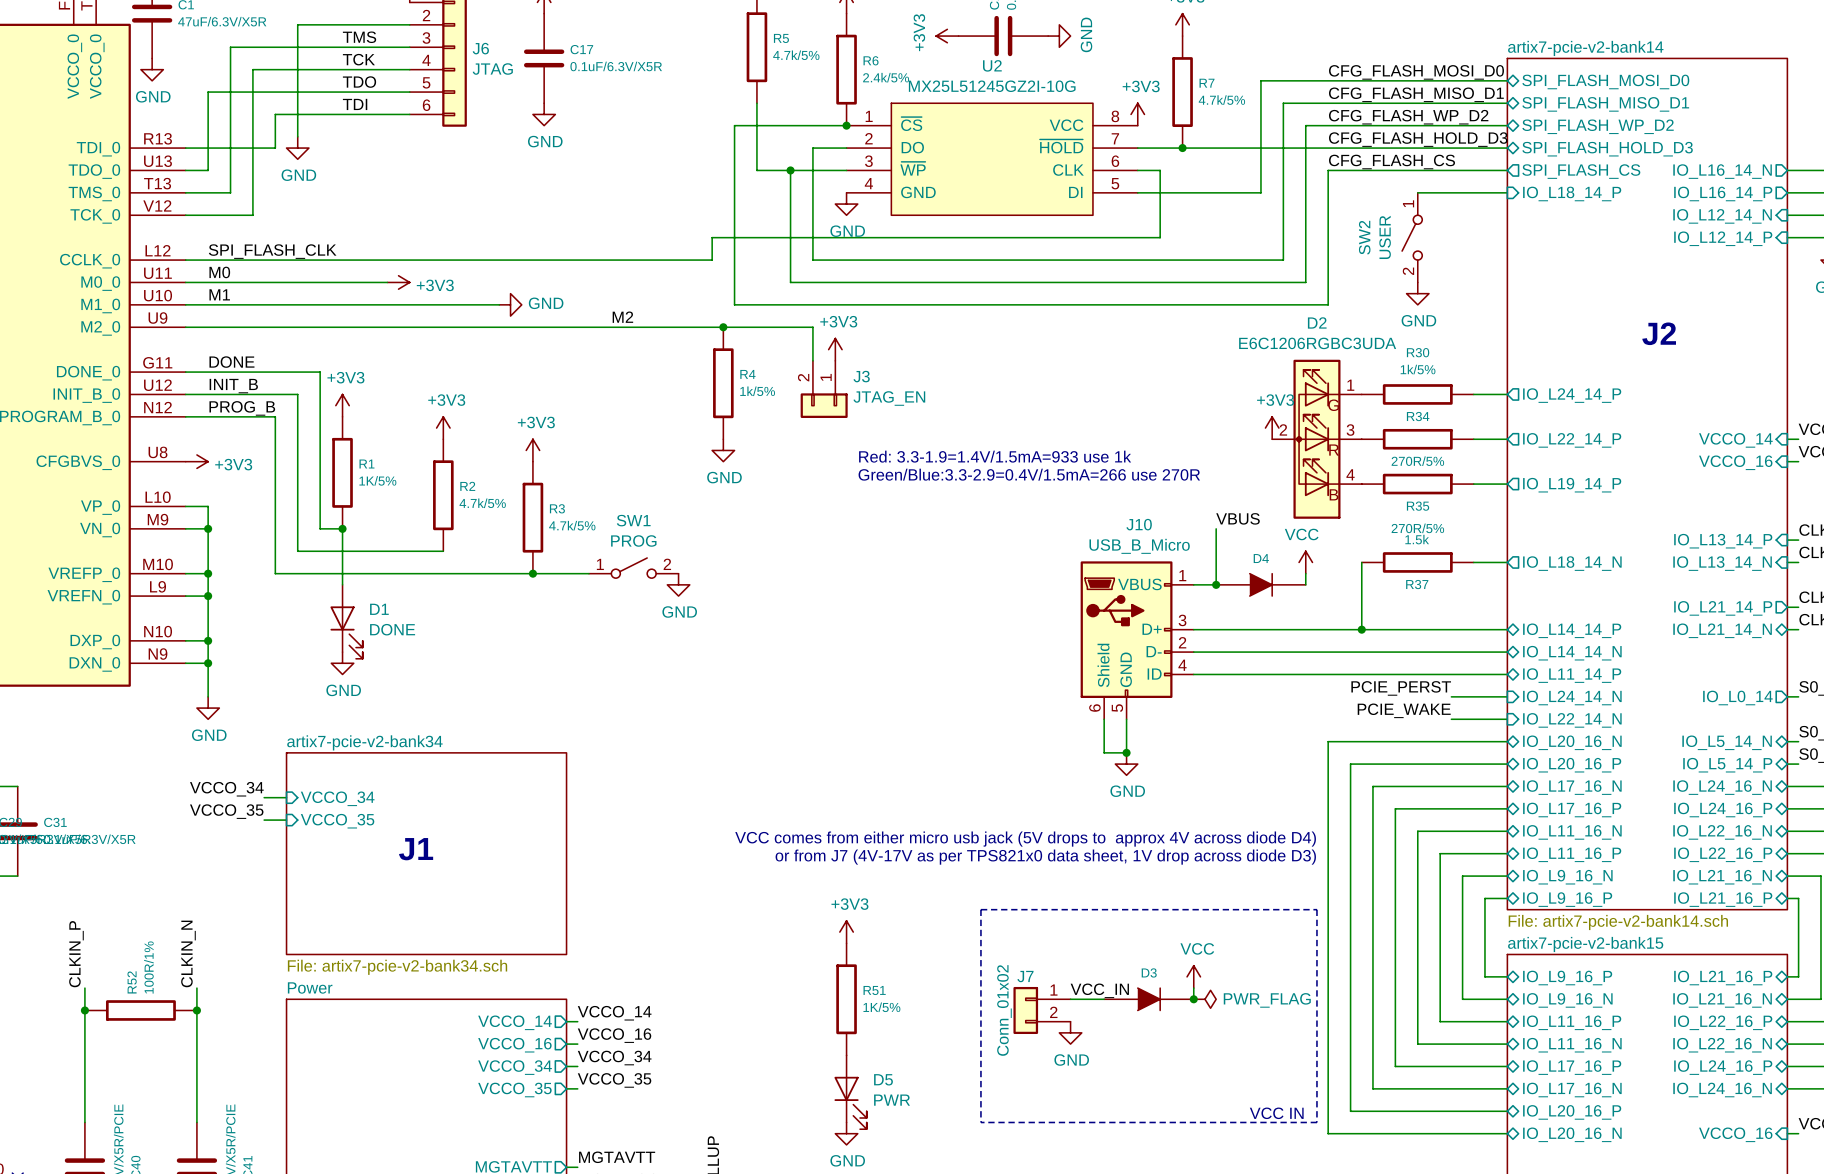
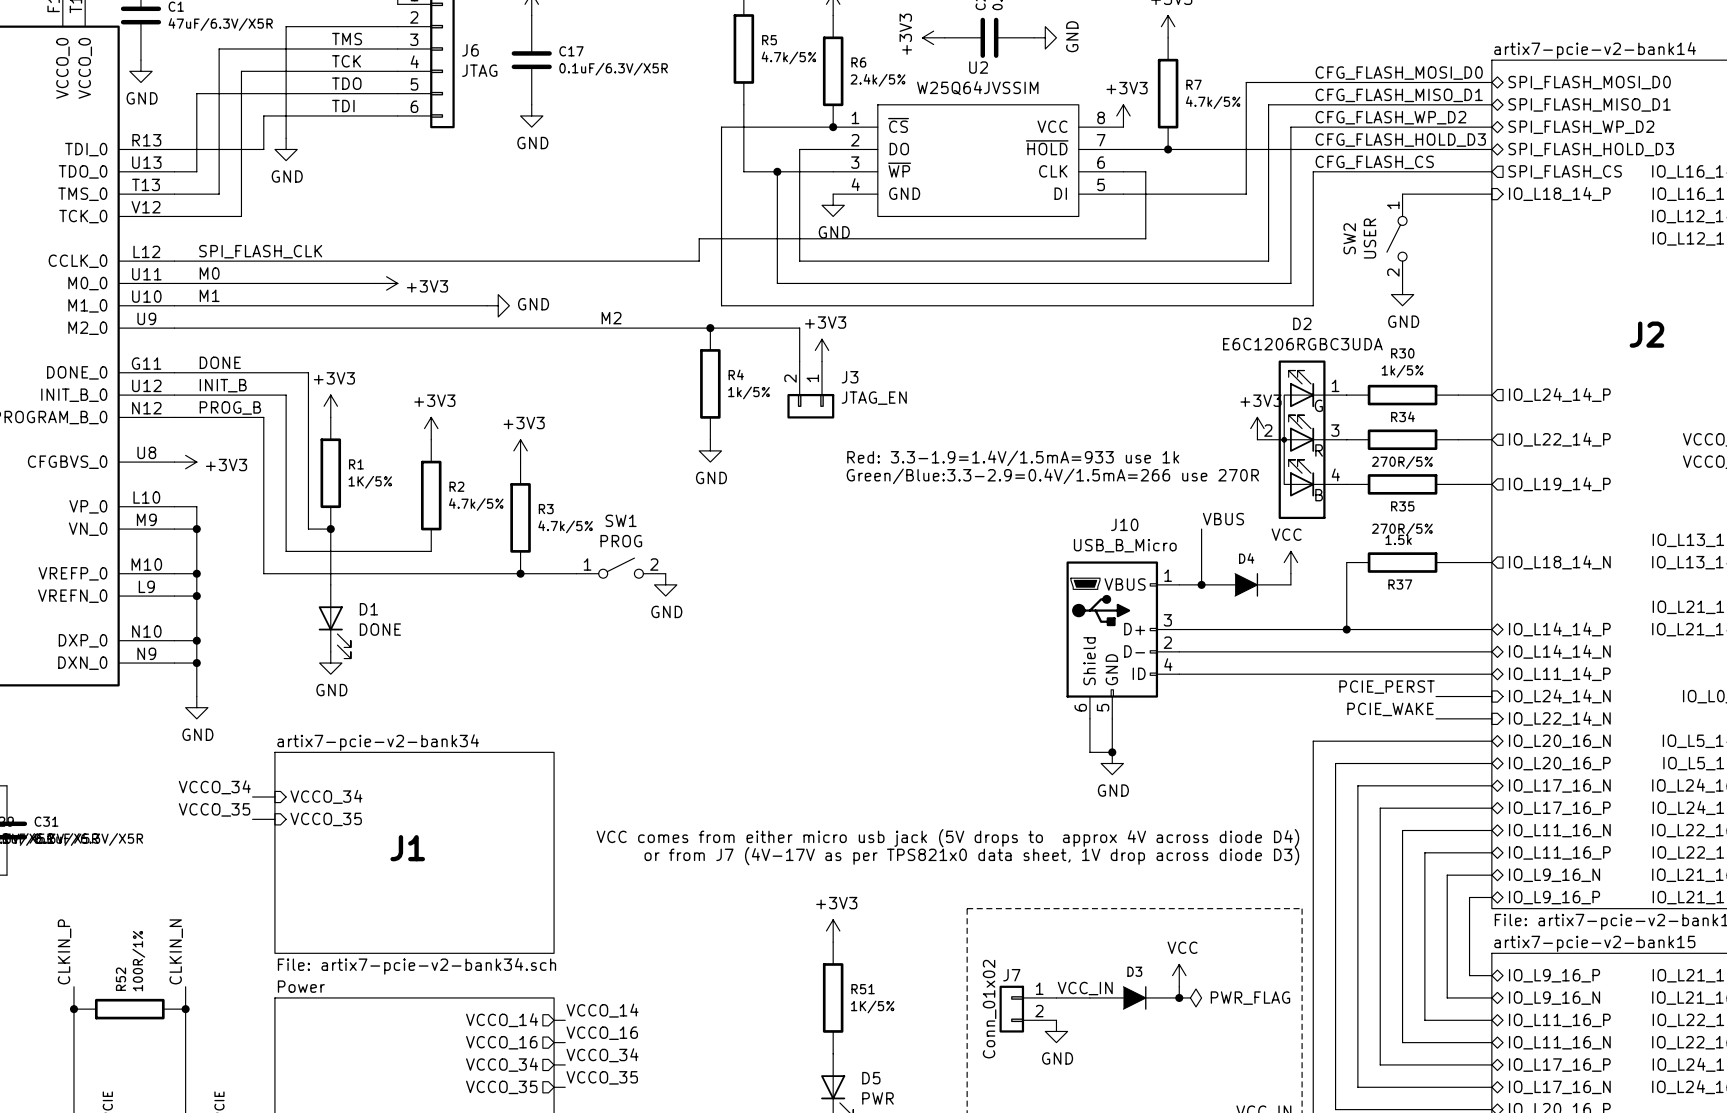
U2 value: MX25L51245GZ2I-10G (992, 86) -> W25Q64JVSSIM (977, 88)

